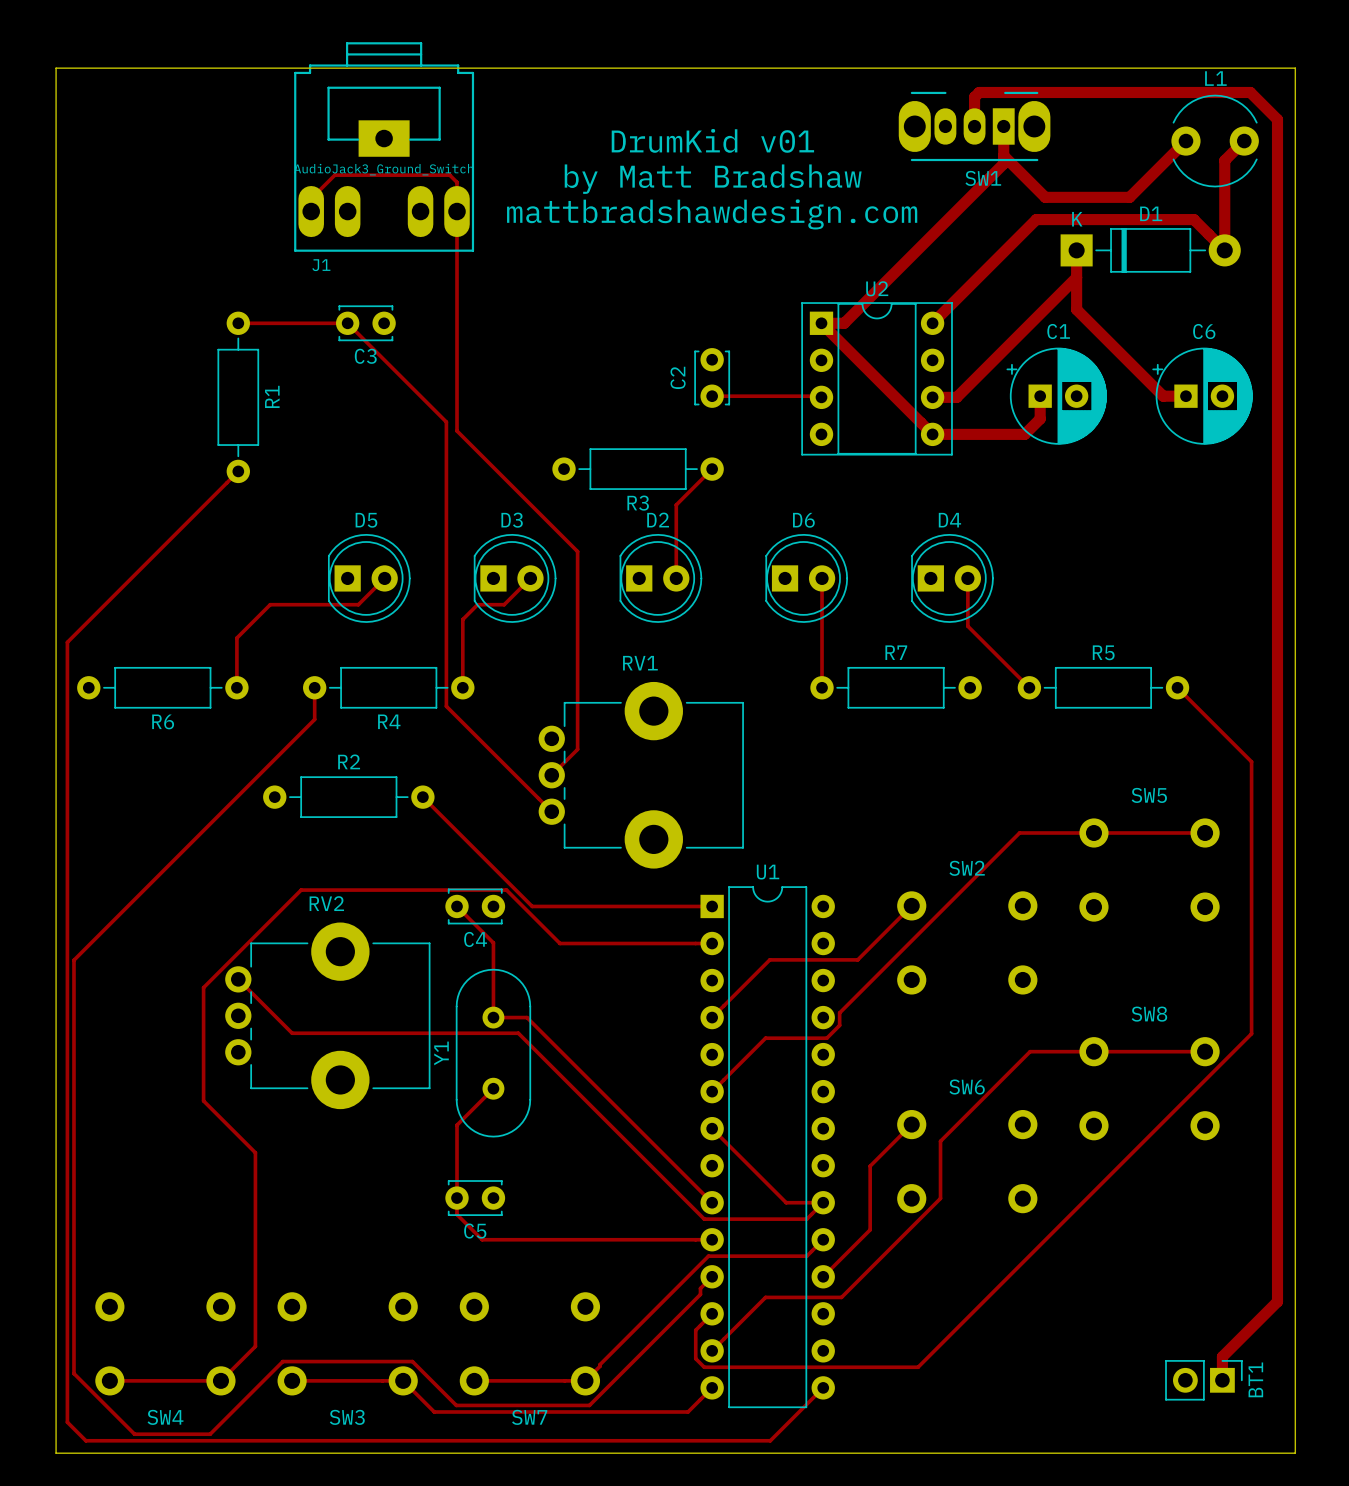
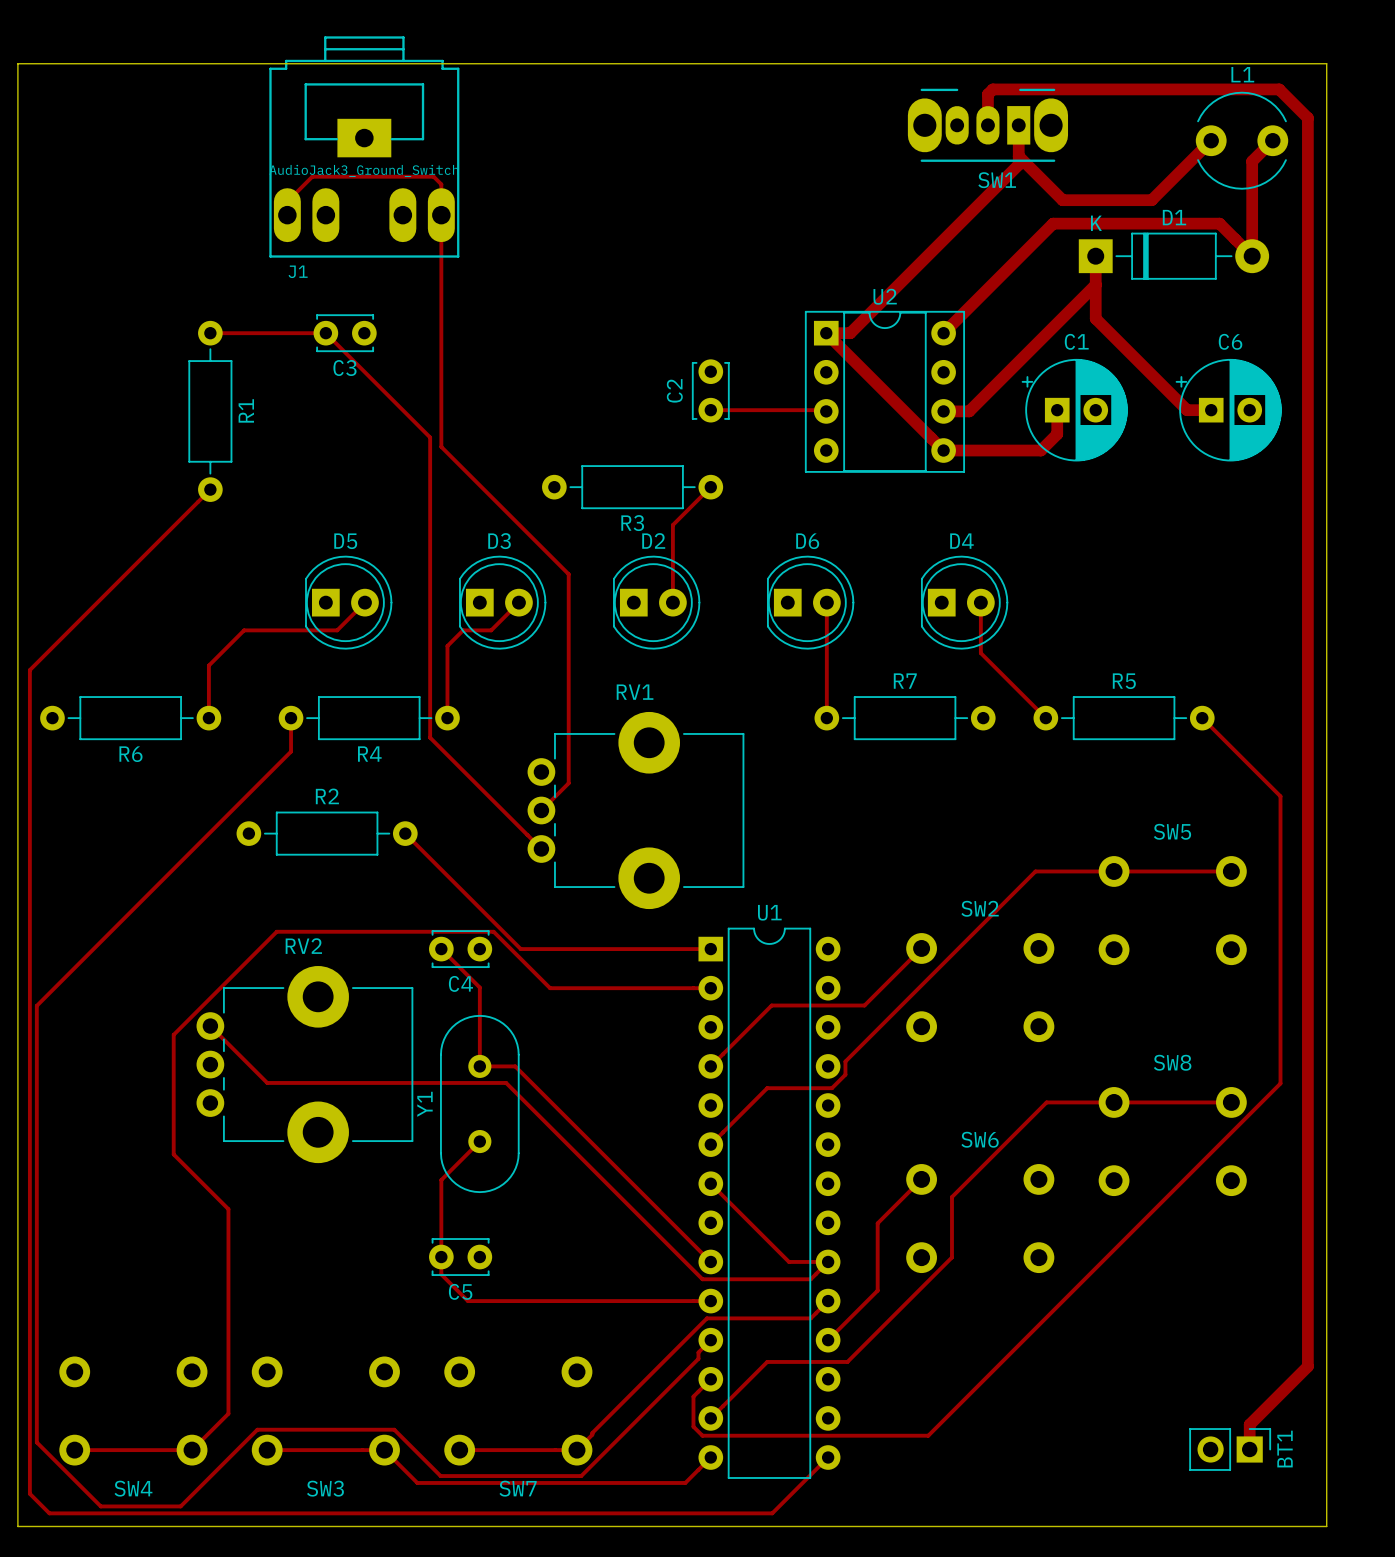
text: DrumKid v01 (712, 140) -> none
text: by Matt Bradshaw (713, 179) -> none
text: mattbradshawdesign.com (712, 214) -> none

